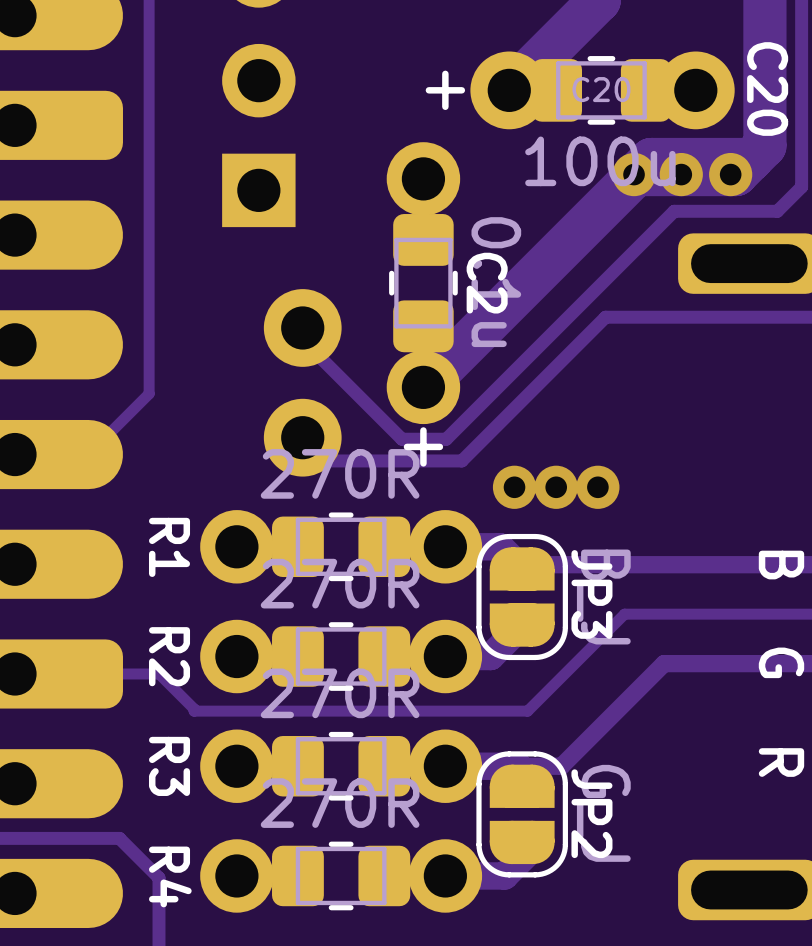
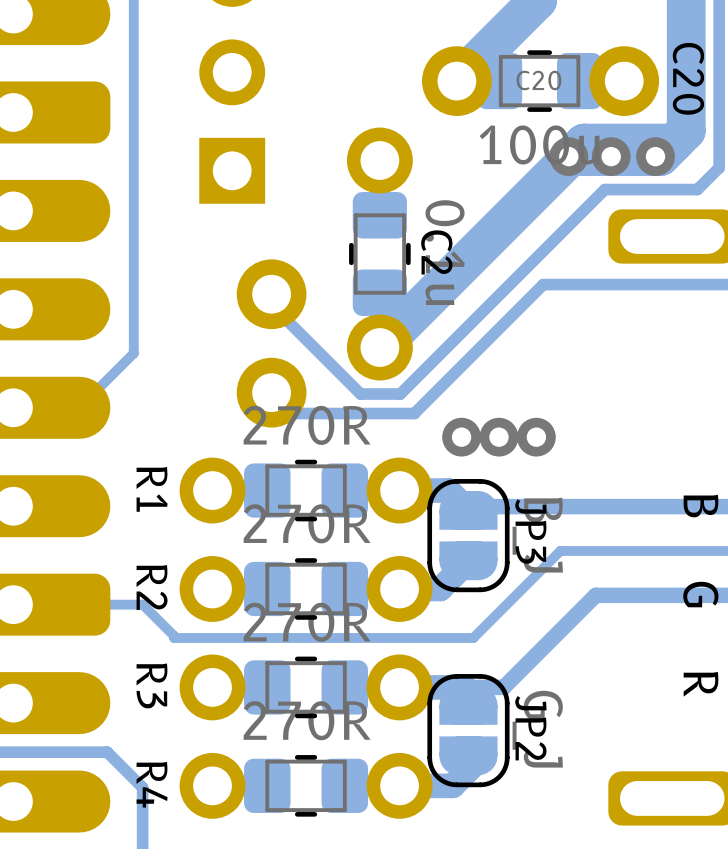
text: + (445, 90) -> none
text: + (423, 446) -> none

